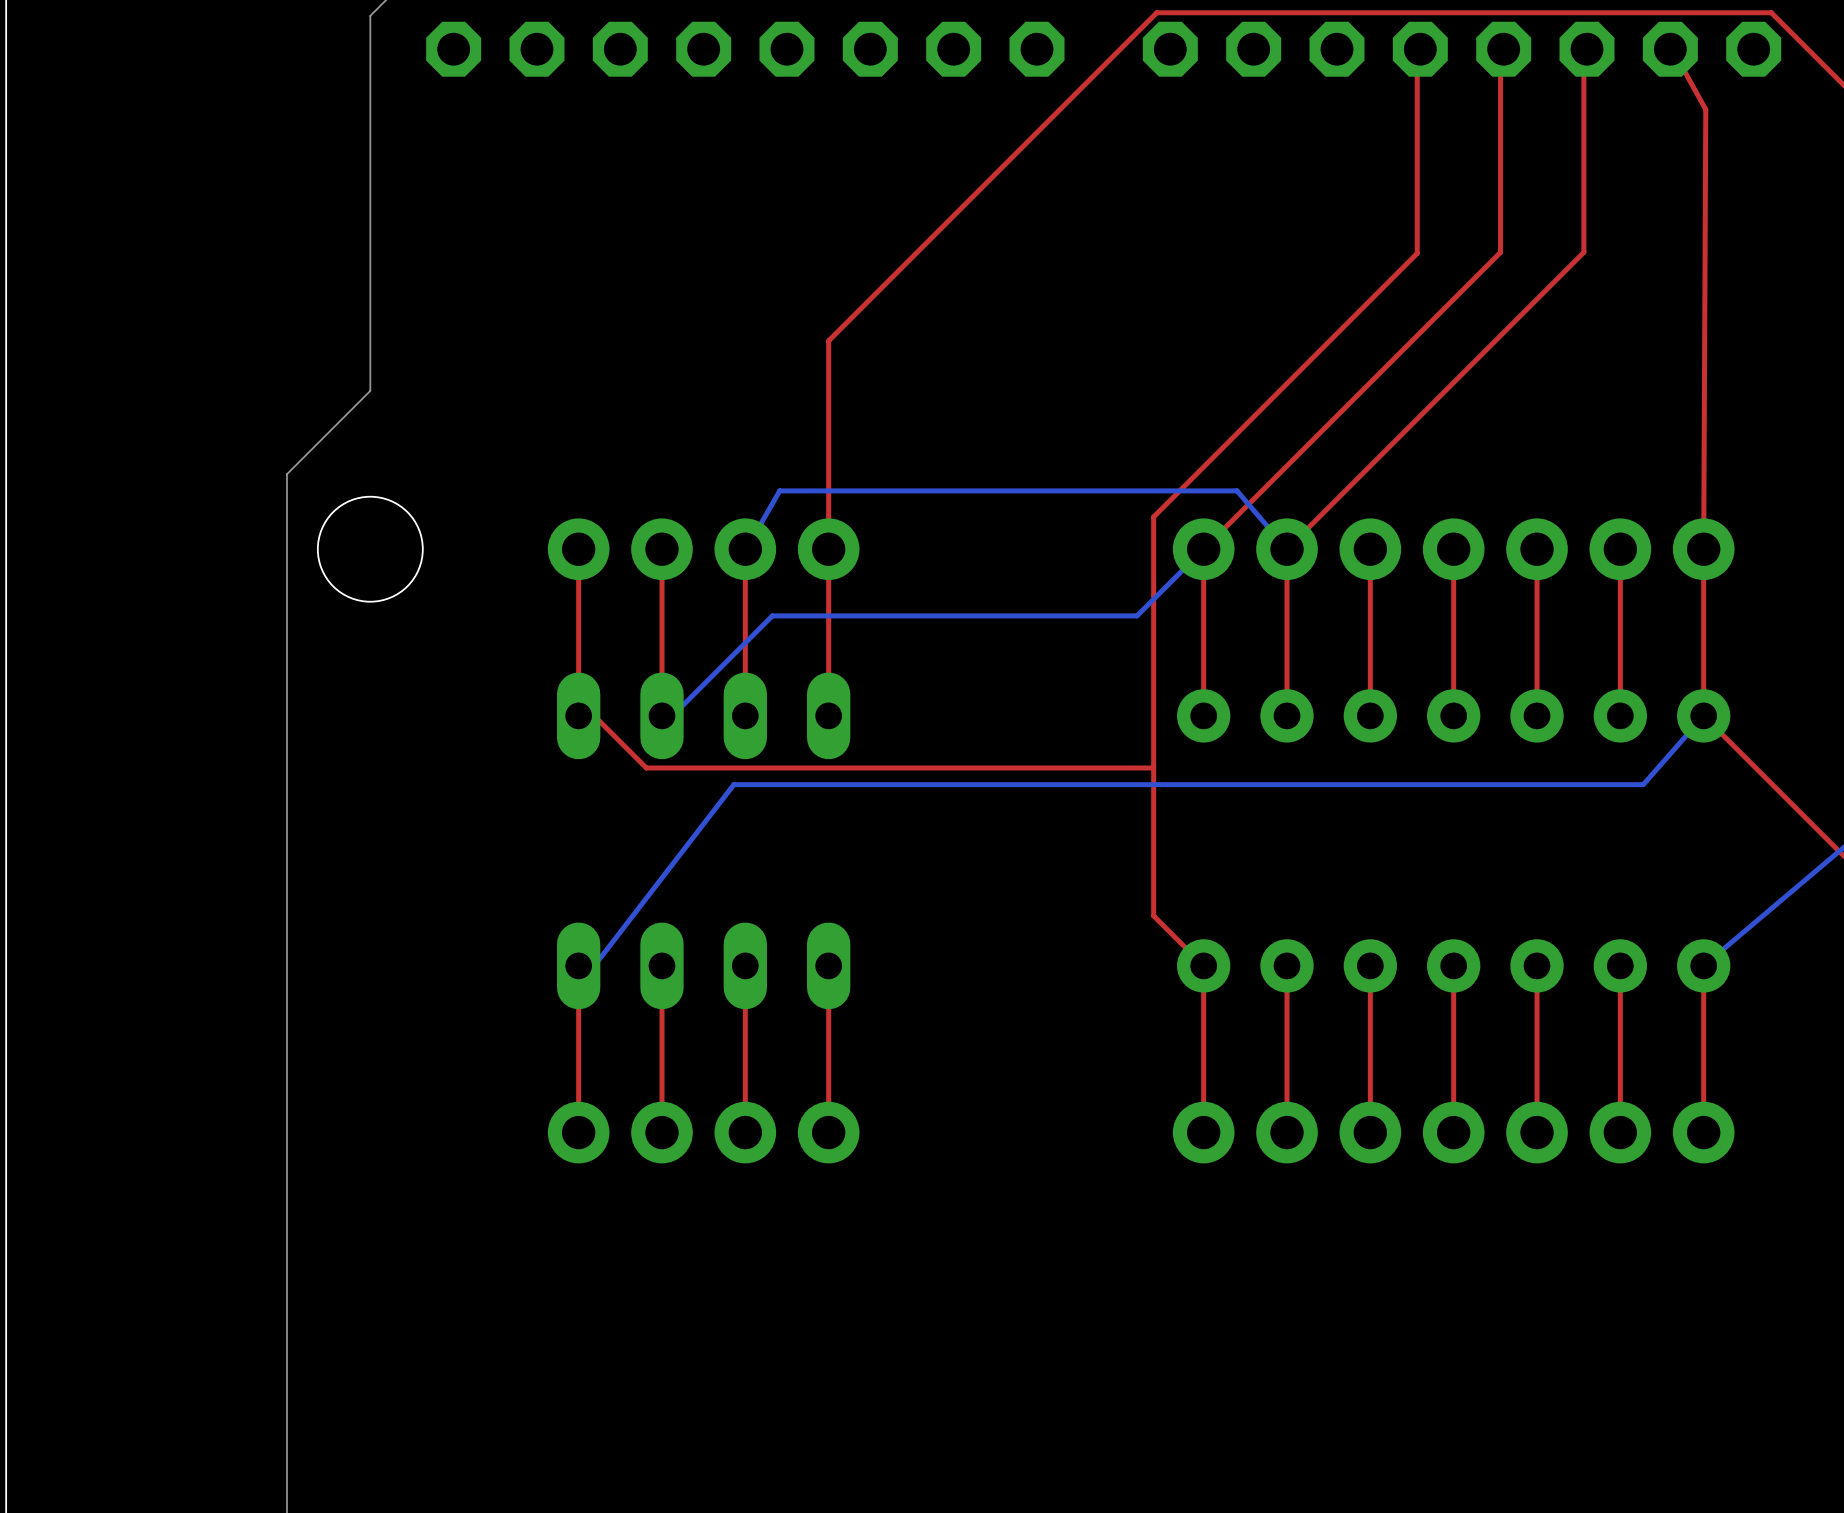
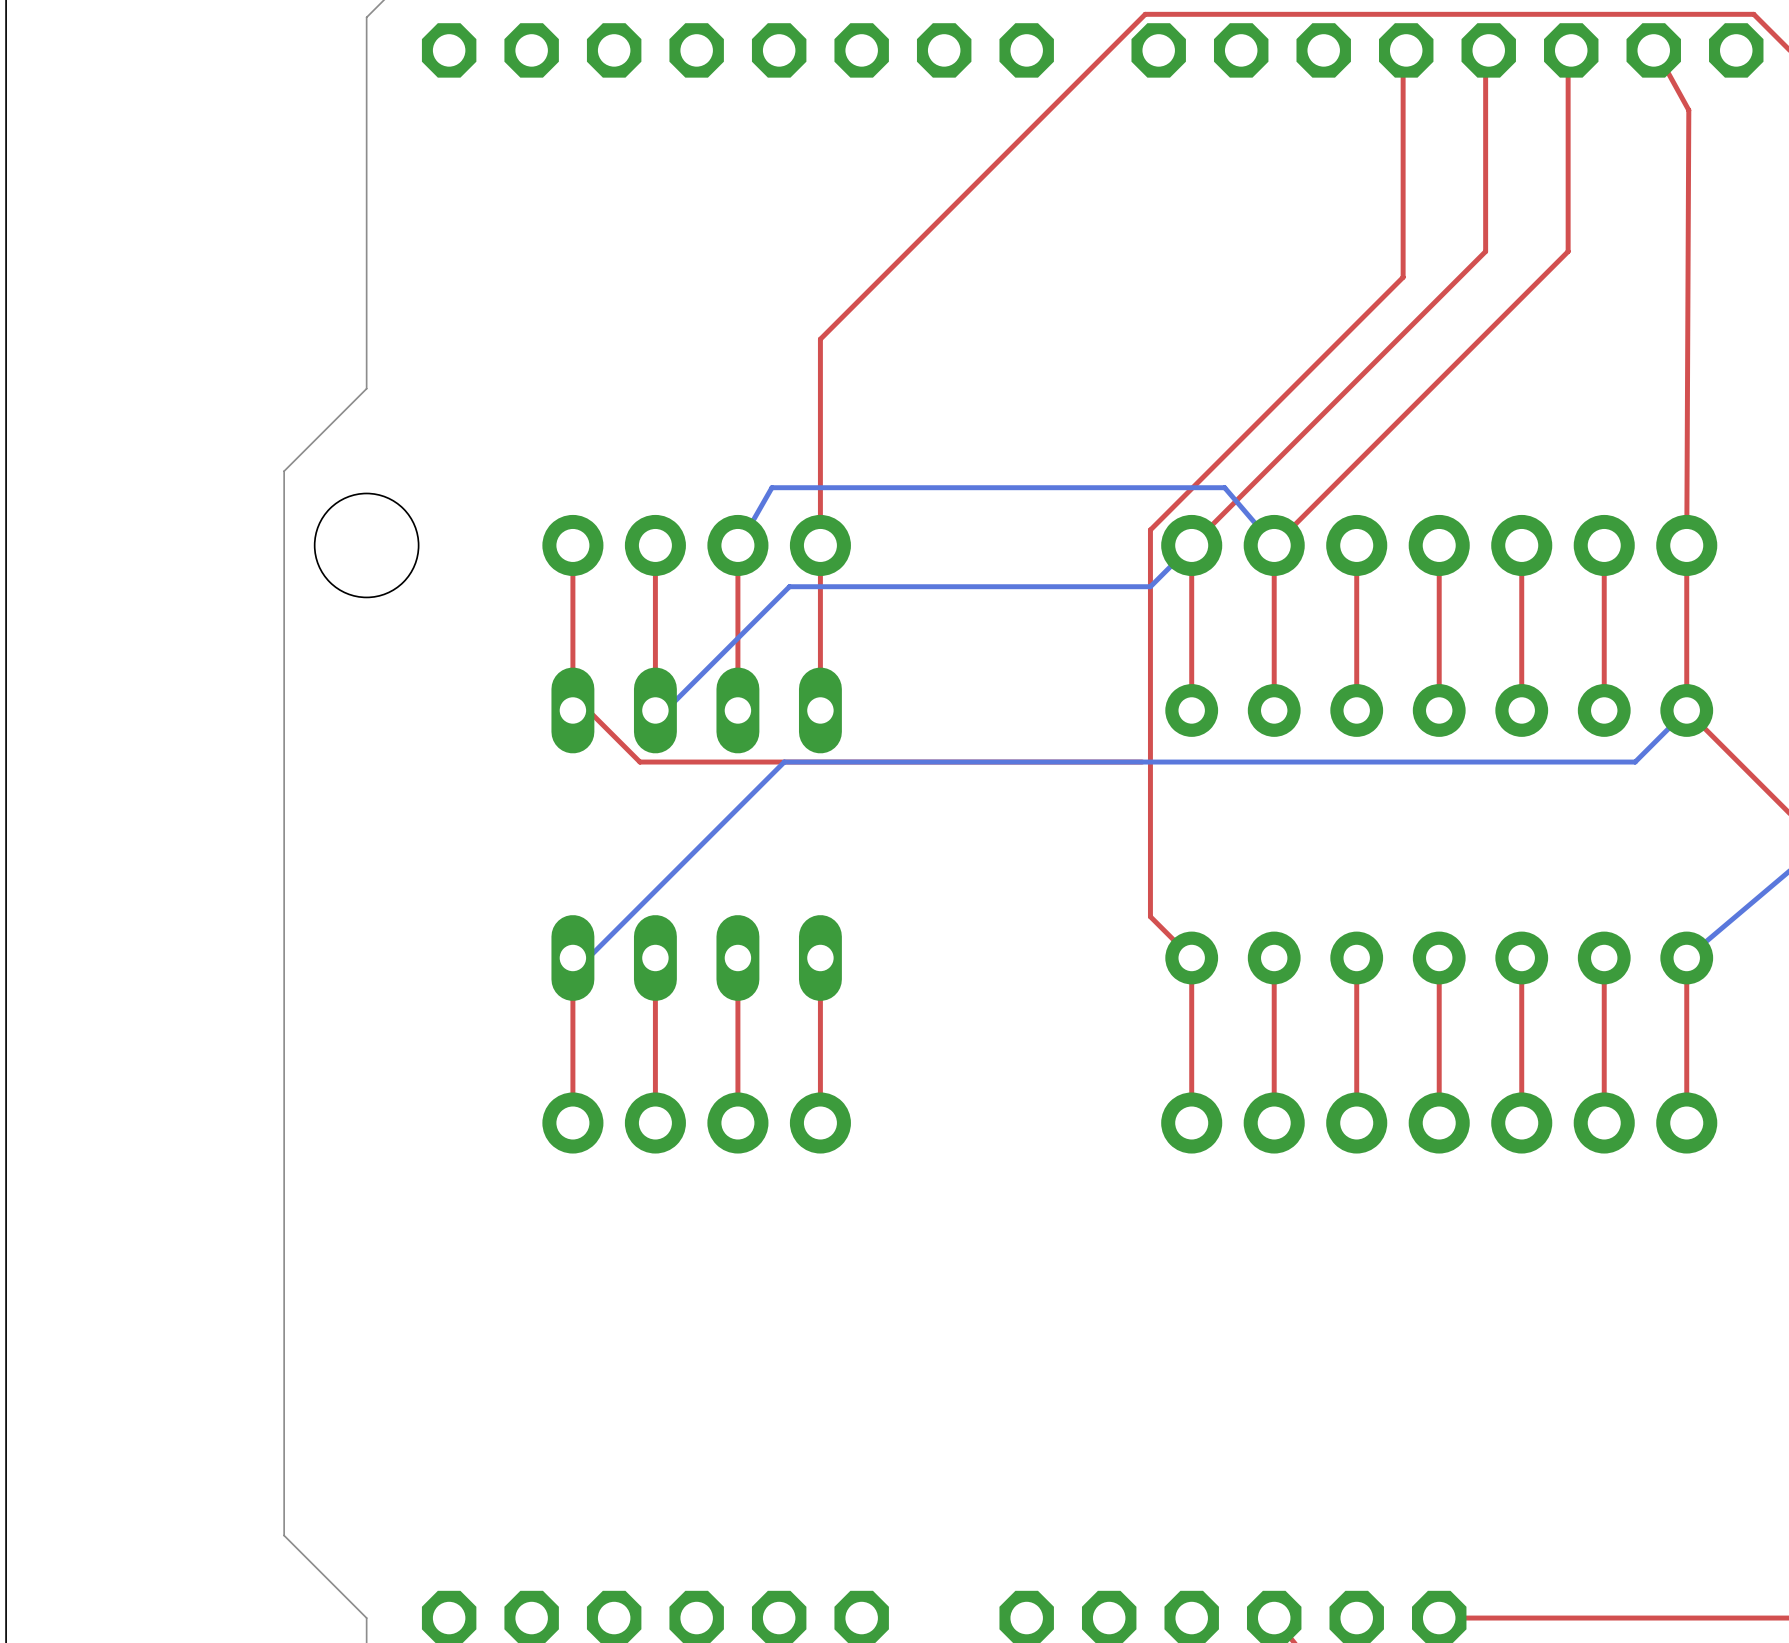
top track: (1417, 253) (1153, 516) (1153, 915) (1162, 924) -> (1403, 252) (1403, 277) (1150, 529) (1150, 916)
bottom track: (1162, 590) (1137, 615) (772, 615) -> (1150, 586) (789, 586) (764, 611)
bottom track: (1703, 715) (1643, 784) (733, 784) (594, 965) -> (1686, 710) (1635, 762) (784, 762) (588, 957)

